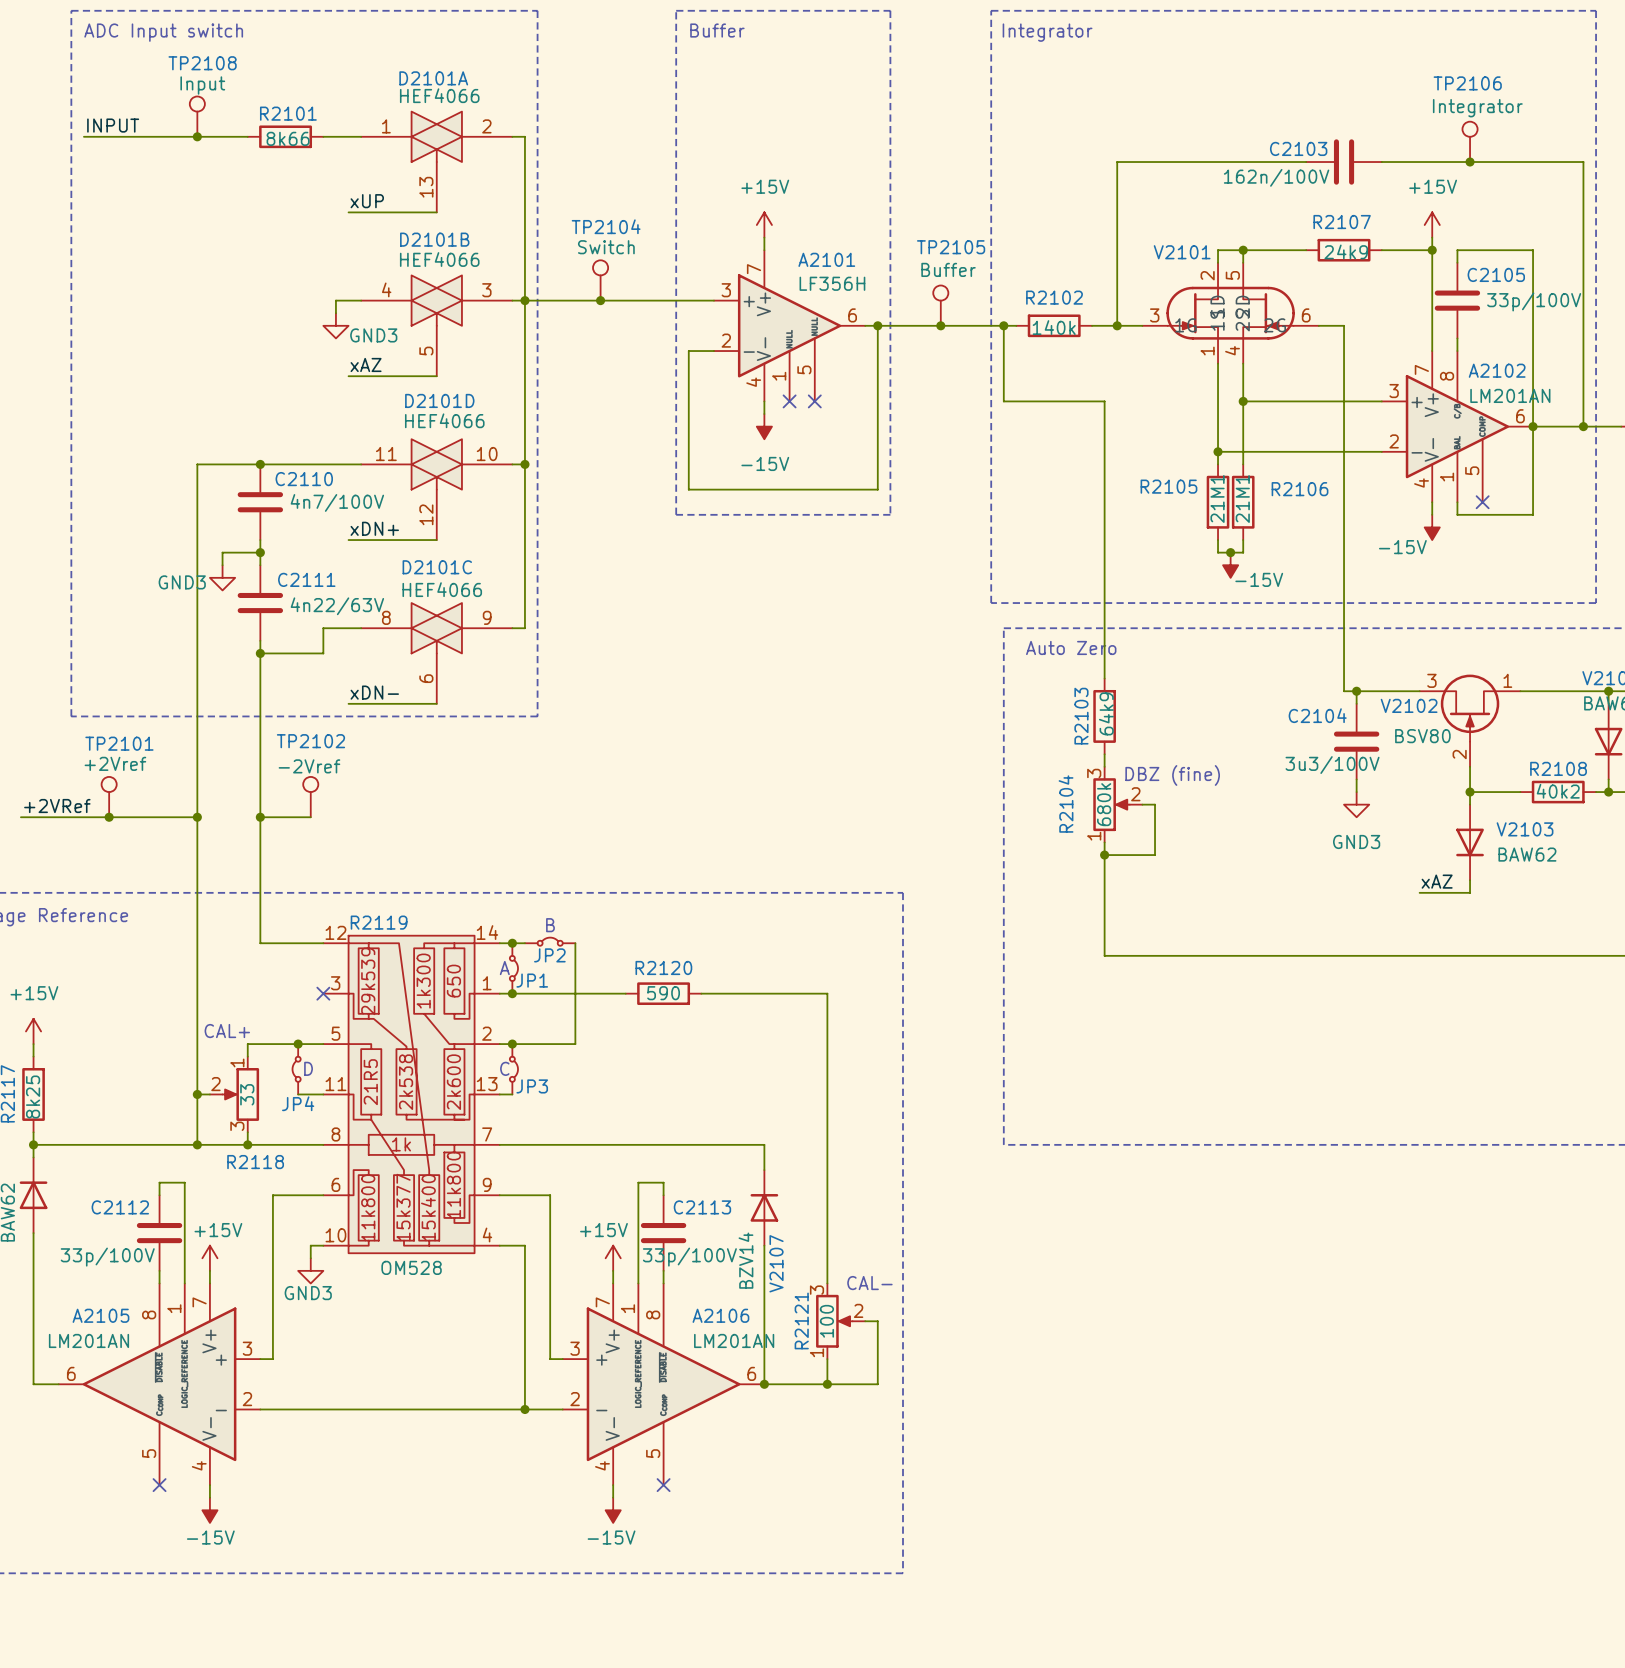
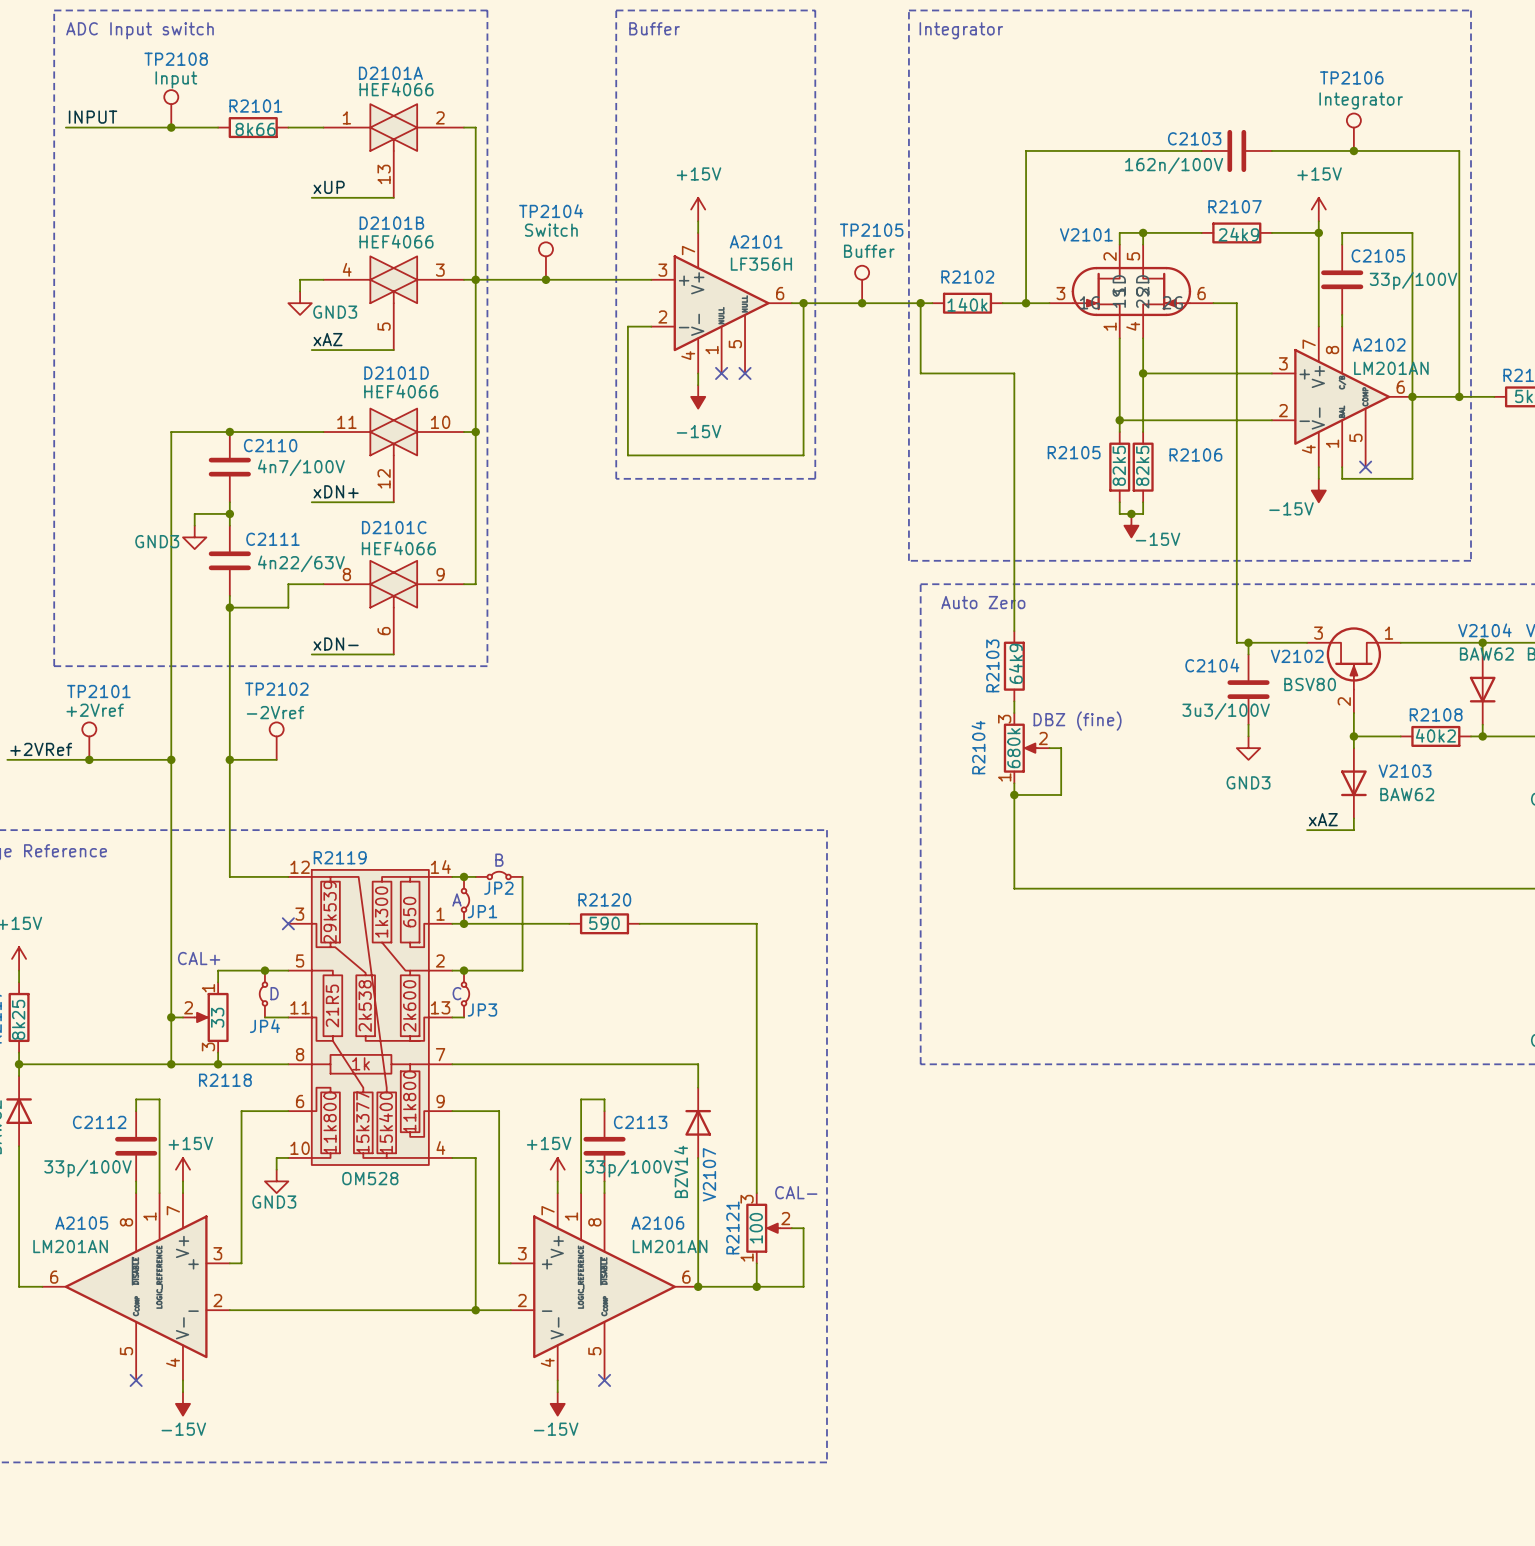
R2105 value: 21M1 (1217, 499) -> 82k5 (1119, 465)
R2106 value: 21M1 (1242, 499) -> 82k5 (1142, 465)

